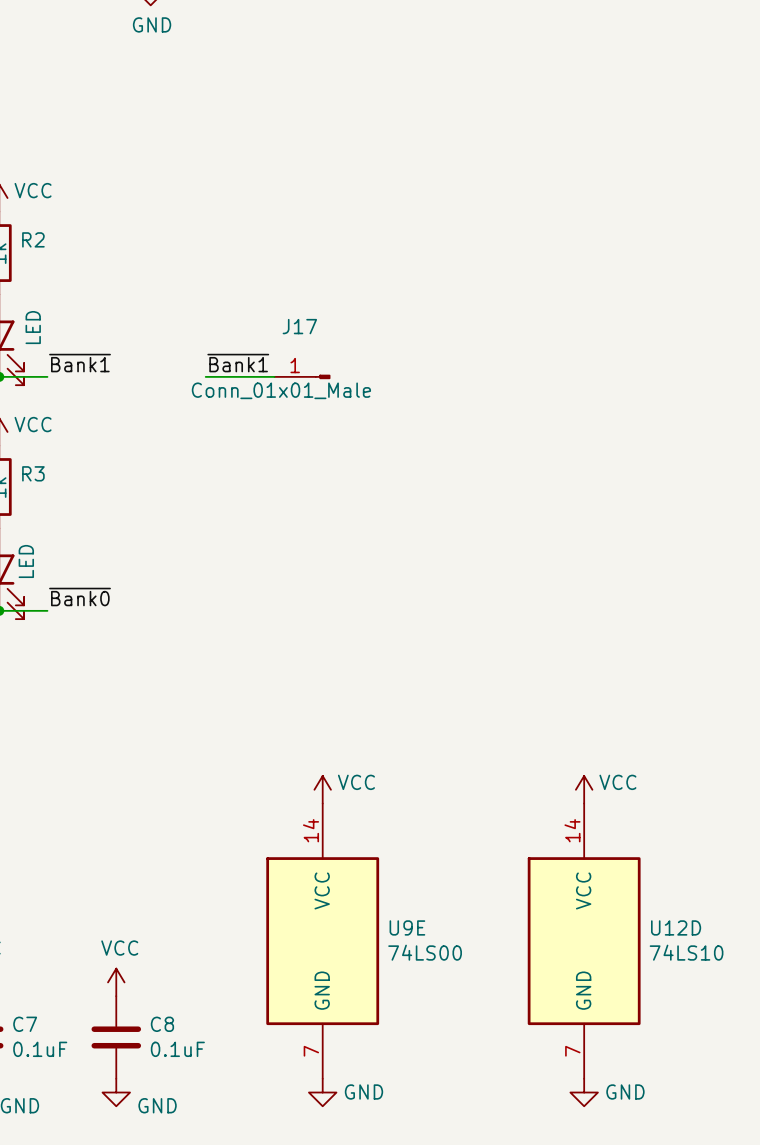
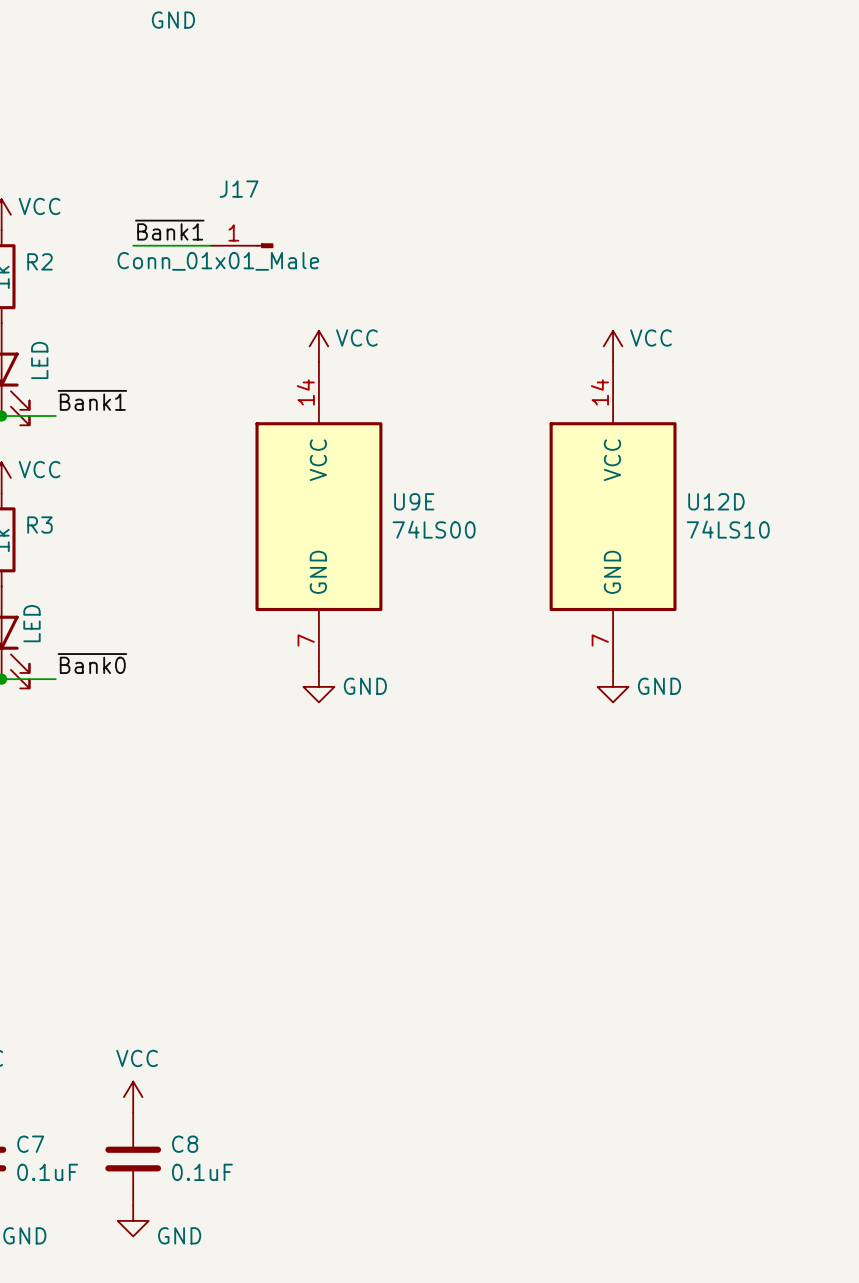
power symbol: none -> VCC (318, 346)
power symbol: none -> VCC (613, 346)
label position: ~{Bank1} (238, 363) -> ~{Bank1} (169, 230)
wire: (205, 376) (274, 376) -> (133, 245) (210, 245)
J17 position: (302, 376) -> (242, 245)
power symbol: none -> GND (318, 686)
power symbol: none -> GND (613, 686)
power symbol: VCC (322, 789) -> none
power symbol: VCC (584, 789) -> none
U9E position: (322, 941) -> (318, 516)
U12D position: (584, 941) -> (613, 516)
power symbol: GND (322, 1092) -> none
power symbol: GND (584, 1092) -> none

